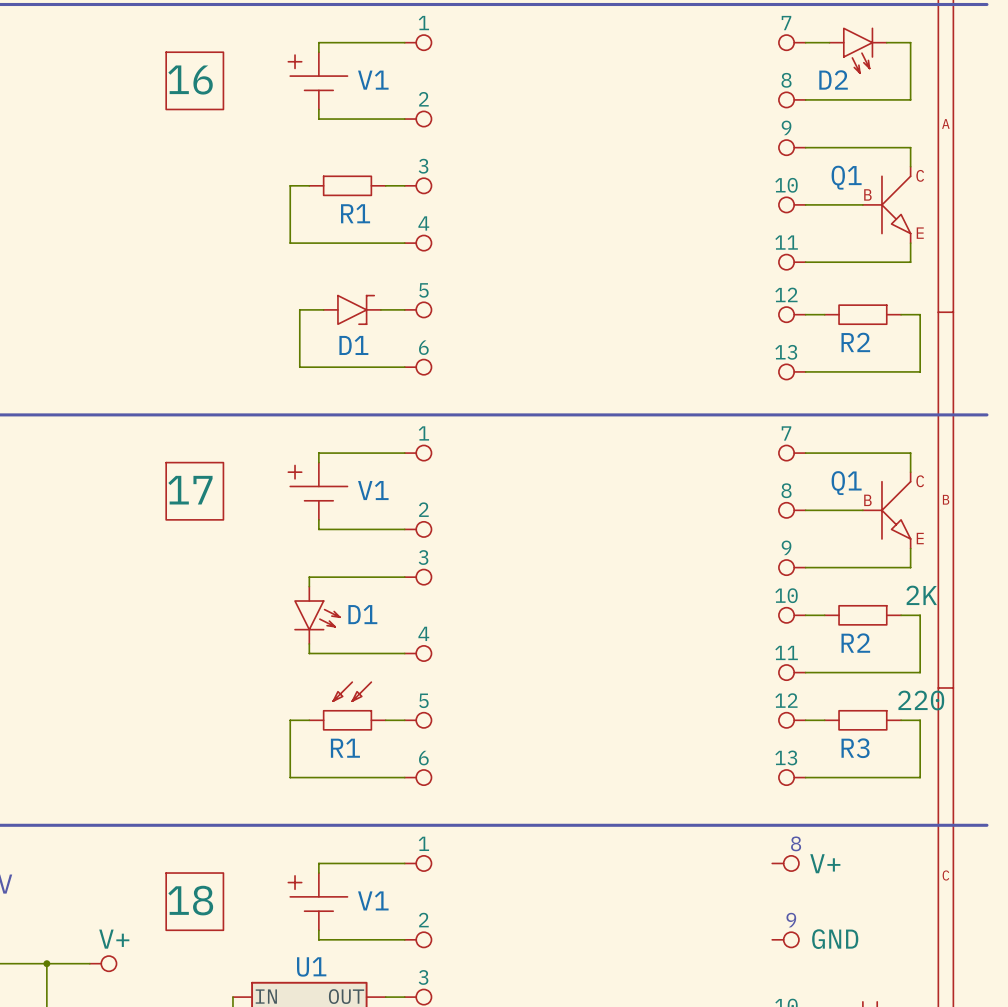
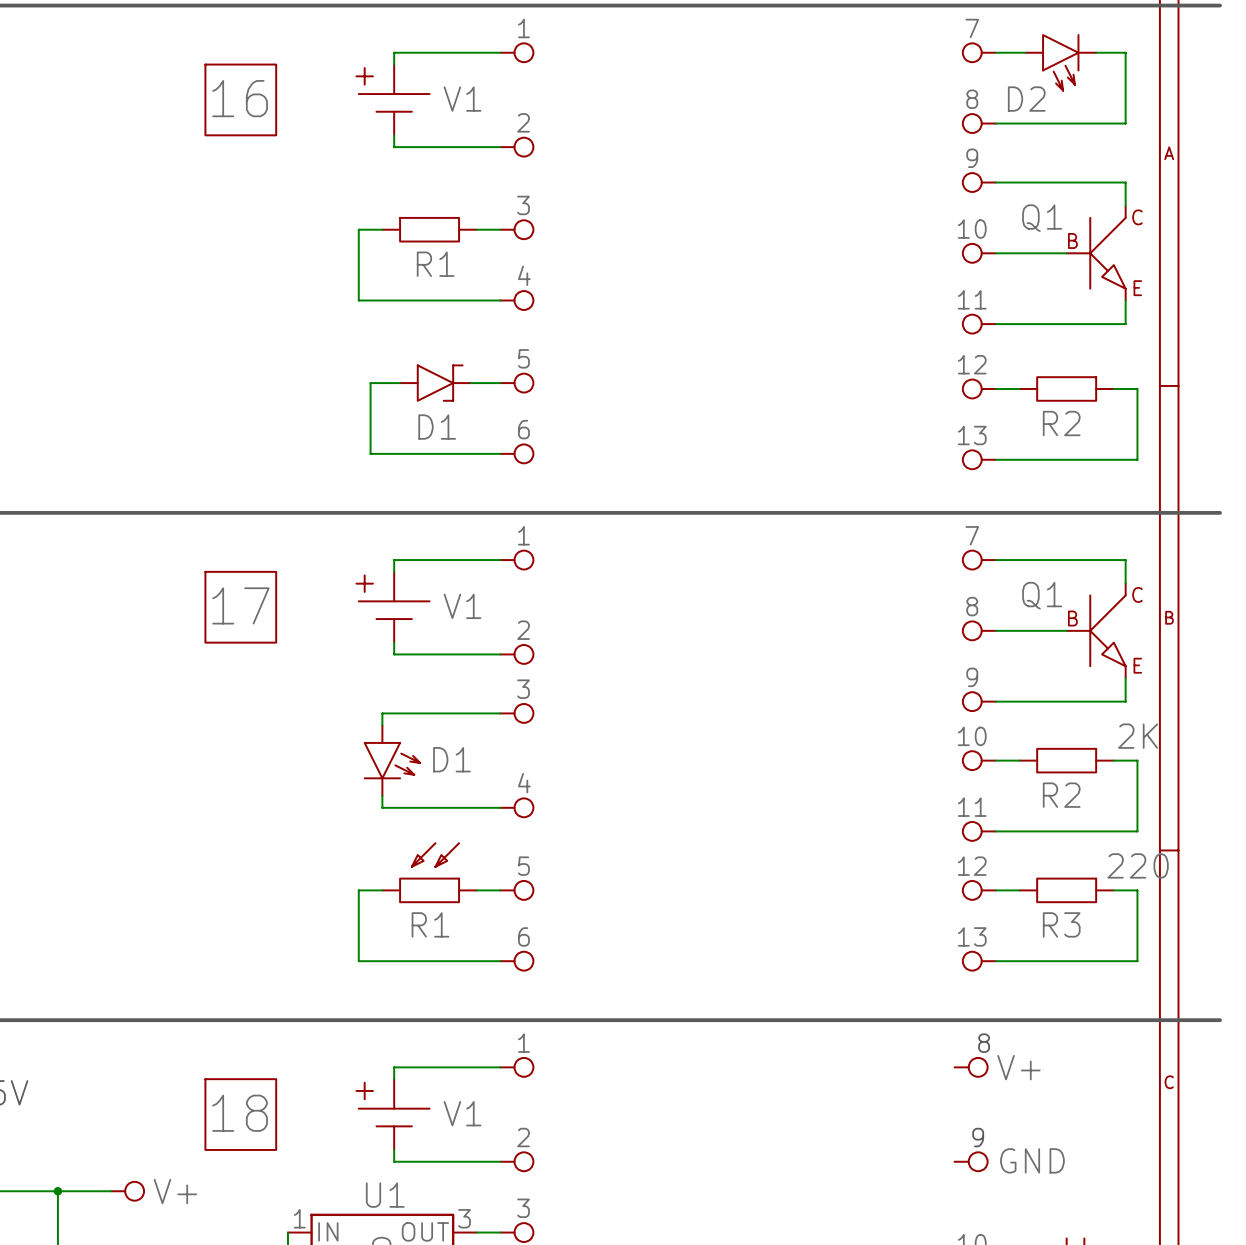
part value position: V+ (114, 939) -> V+ (175, 1191)
U1 pin number: none -> 1 (299, 1218)
U1 pin number: none -> 3 (464, 1218)

